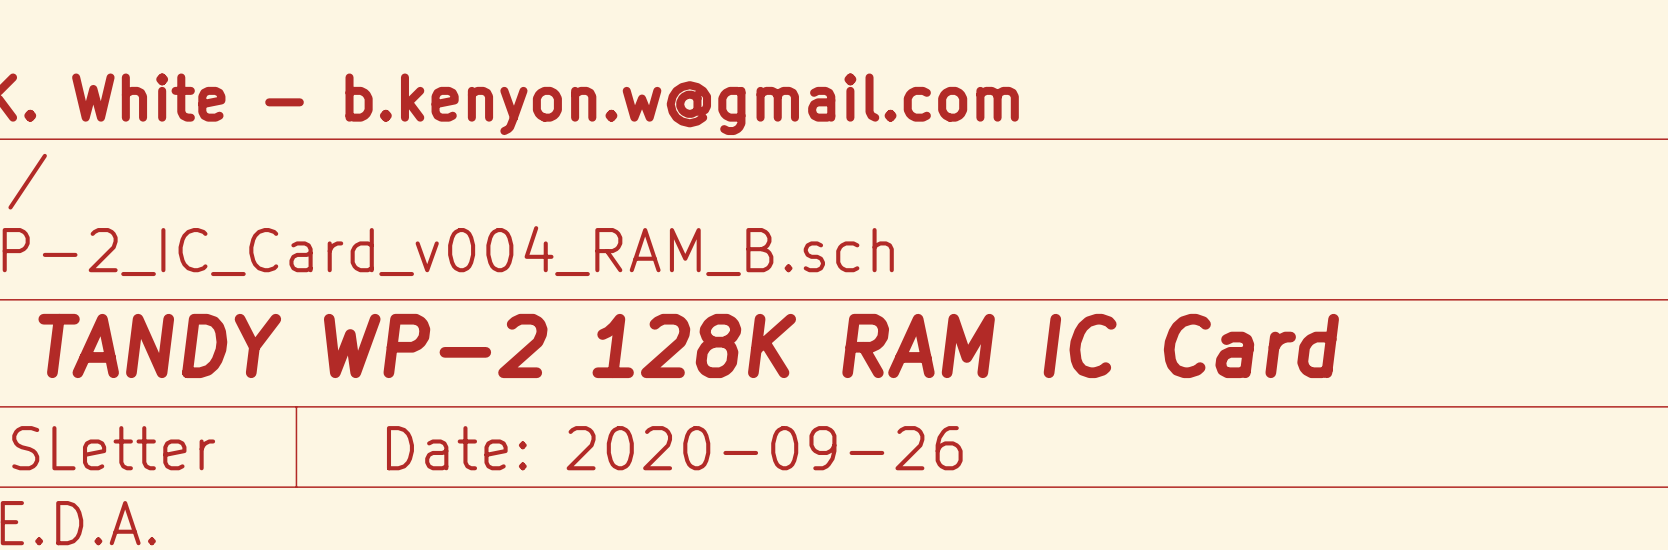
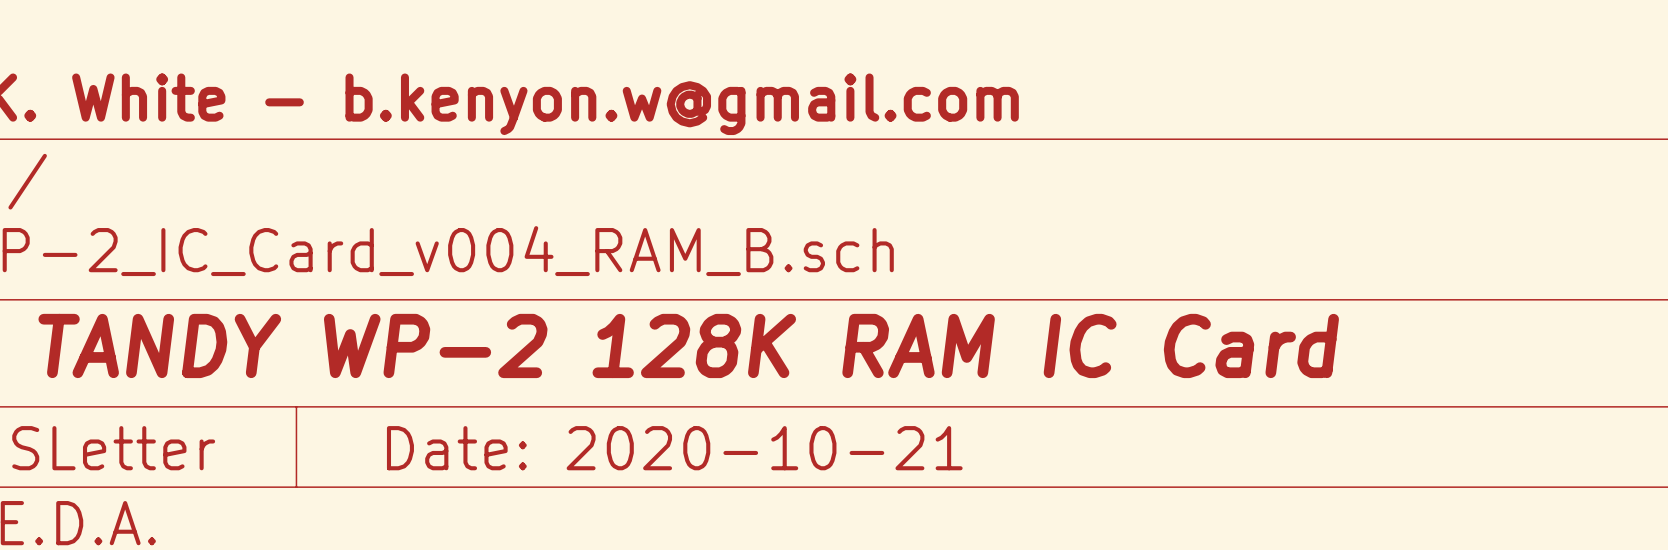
title block: Date: 2020-09-26 (674, 448) -> Date: 2020-10-21 (674, 448)

